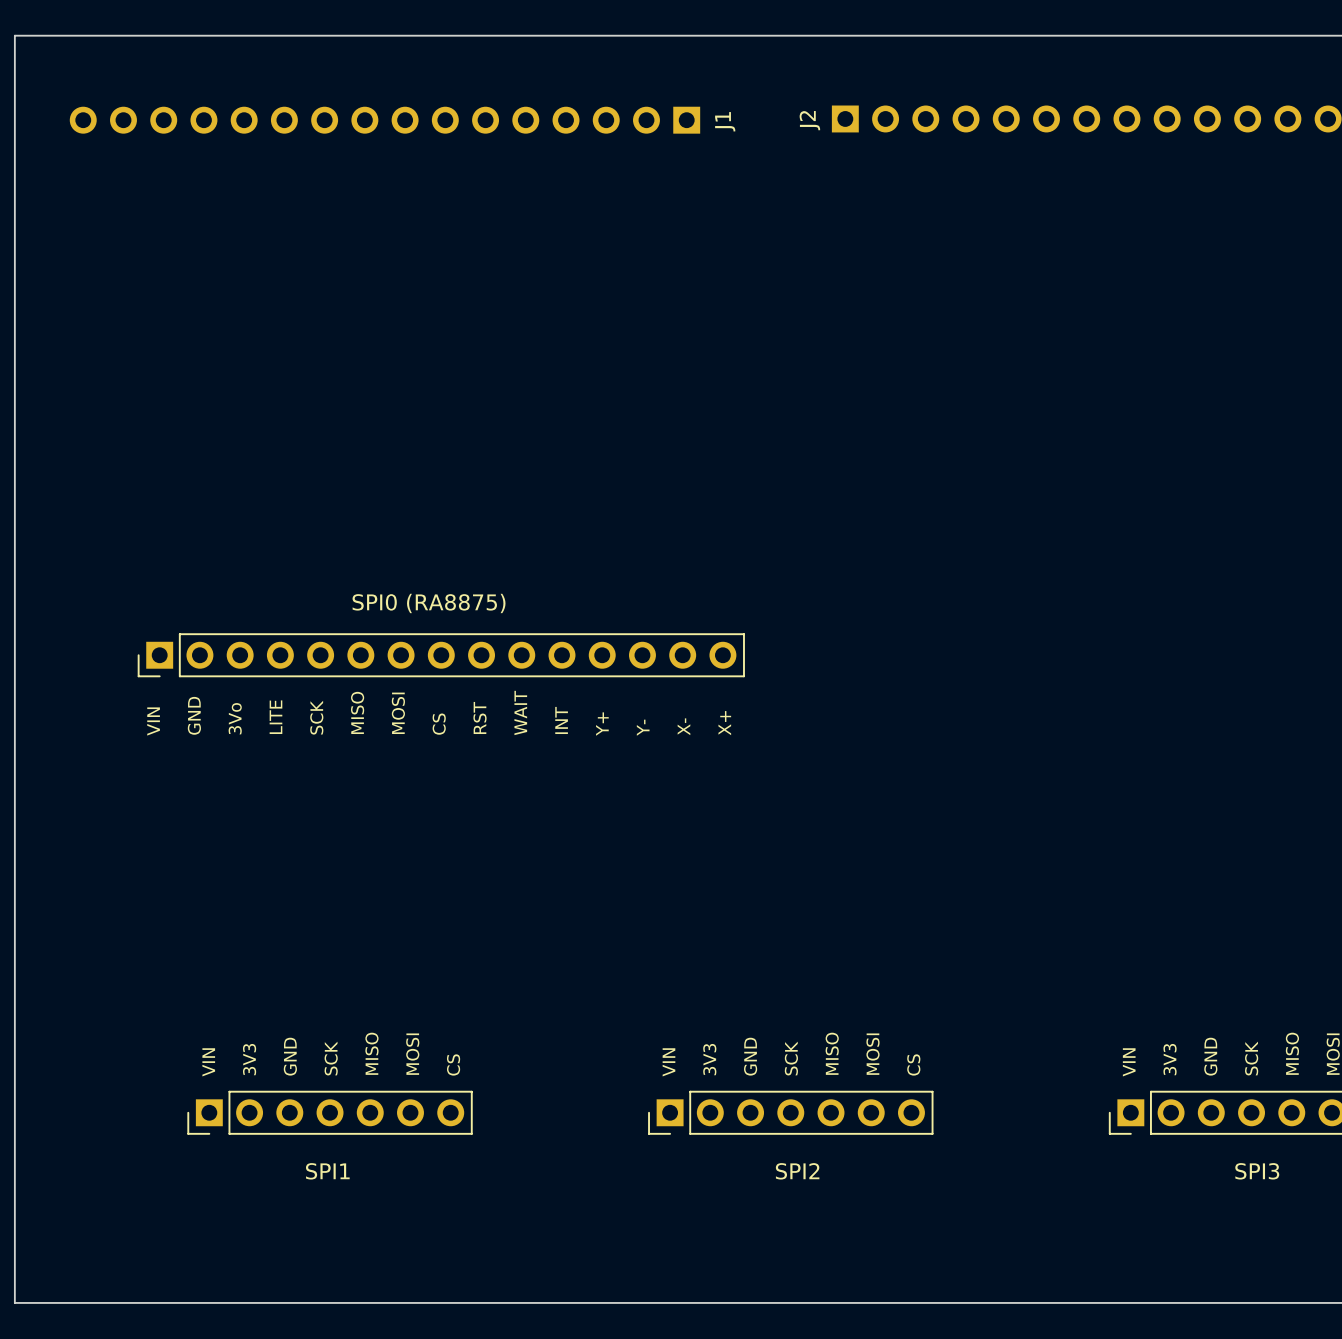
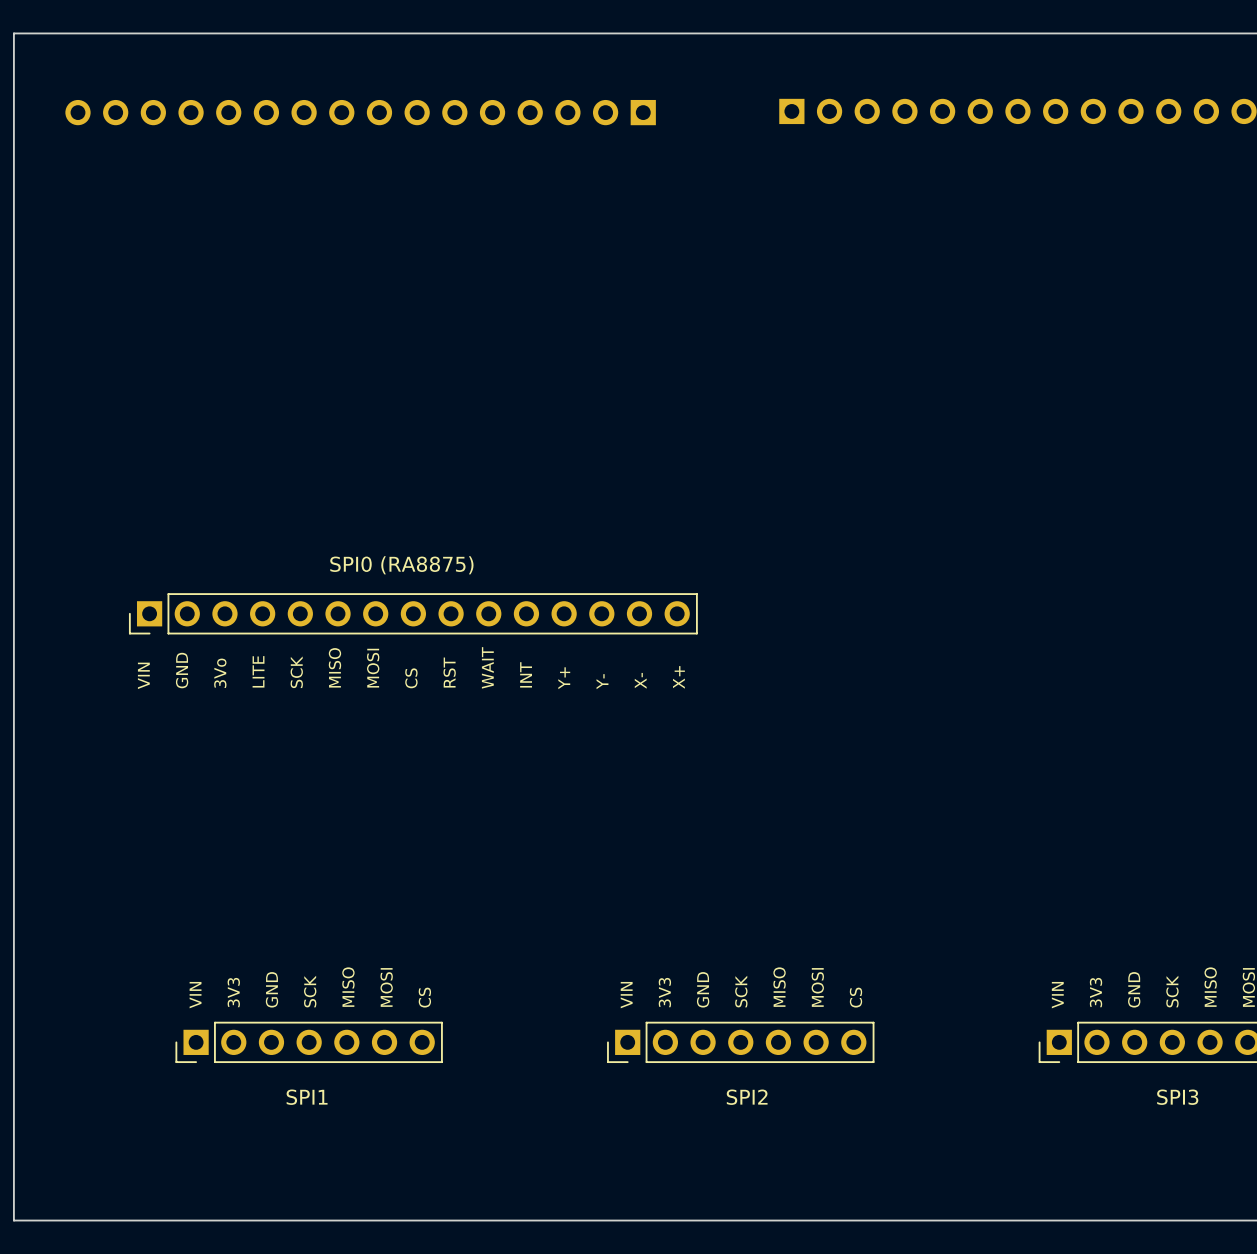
J2 name: J2 (809, 120) -> none
J1 name: J1 (725, 121) -> none

